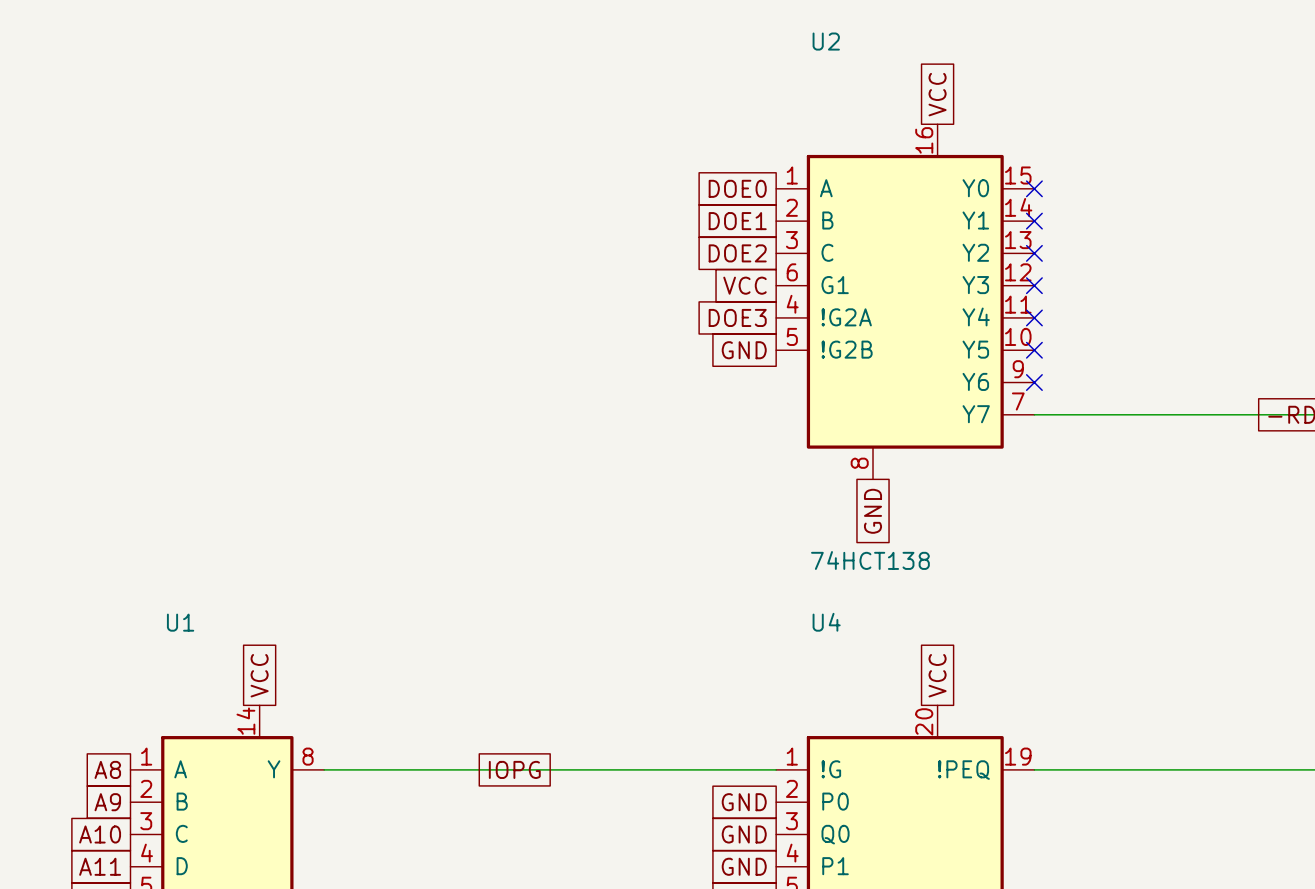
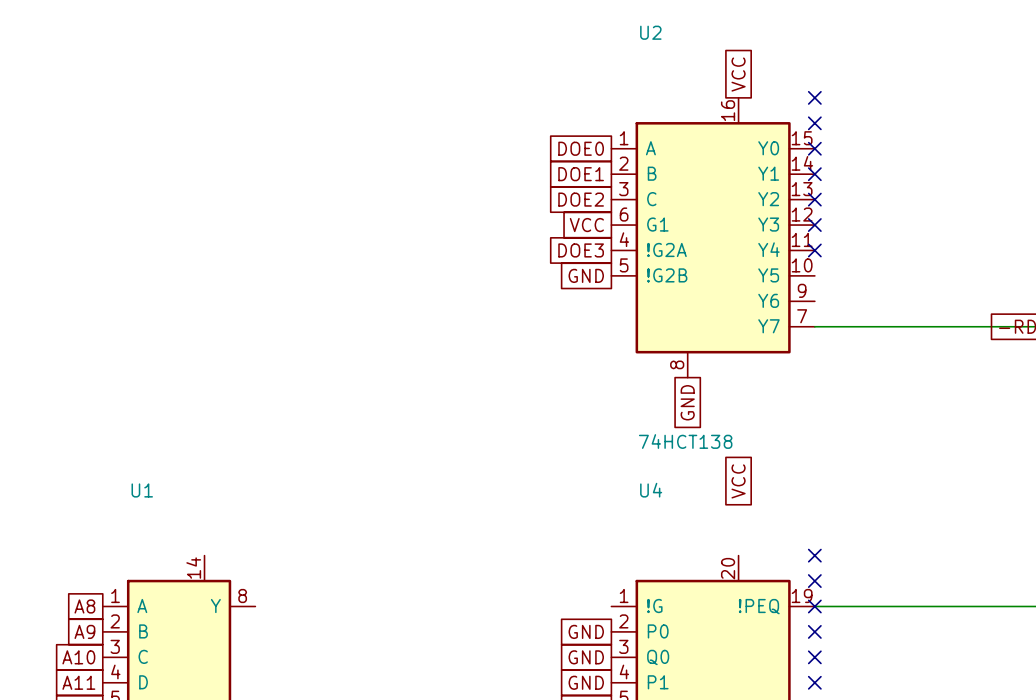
no-connect mark: none -> (814, 97)
no-connect mark: none -> (814, 123)
no-connect mark: (1034, 350) -> none
no-connect mark: (1034, 382) -> none
global label: VCC (259, 675) -> none
global label position: VCC (937, 675) -> VCC (738, 481)
no-connect mark: none -> (814, 555)
no-connect mark: none -> (814, 581)
wire: (324, 769) (776, 769) -> none
global label: IOPG (514, 769) -> none
no-connect mark: none -> (814, 606)
no-connect mark: none -> (814, 631)
no-connect mark: none -> (814, 657)
no-connect mark: none -> (814, 682)

